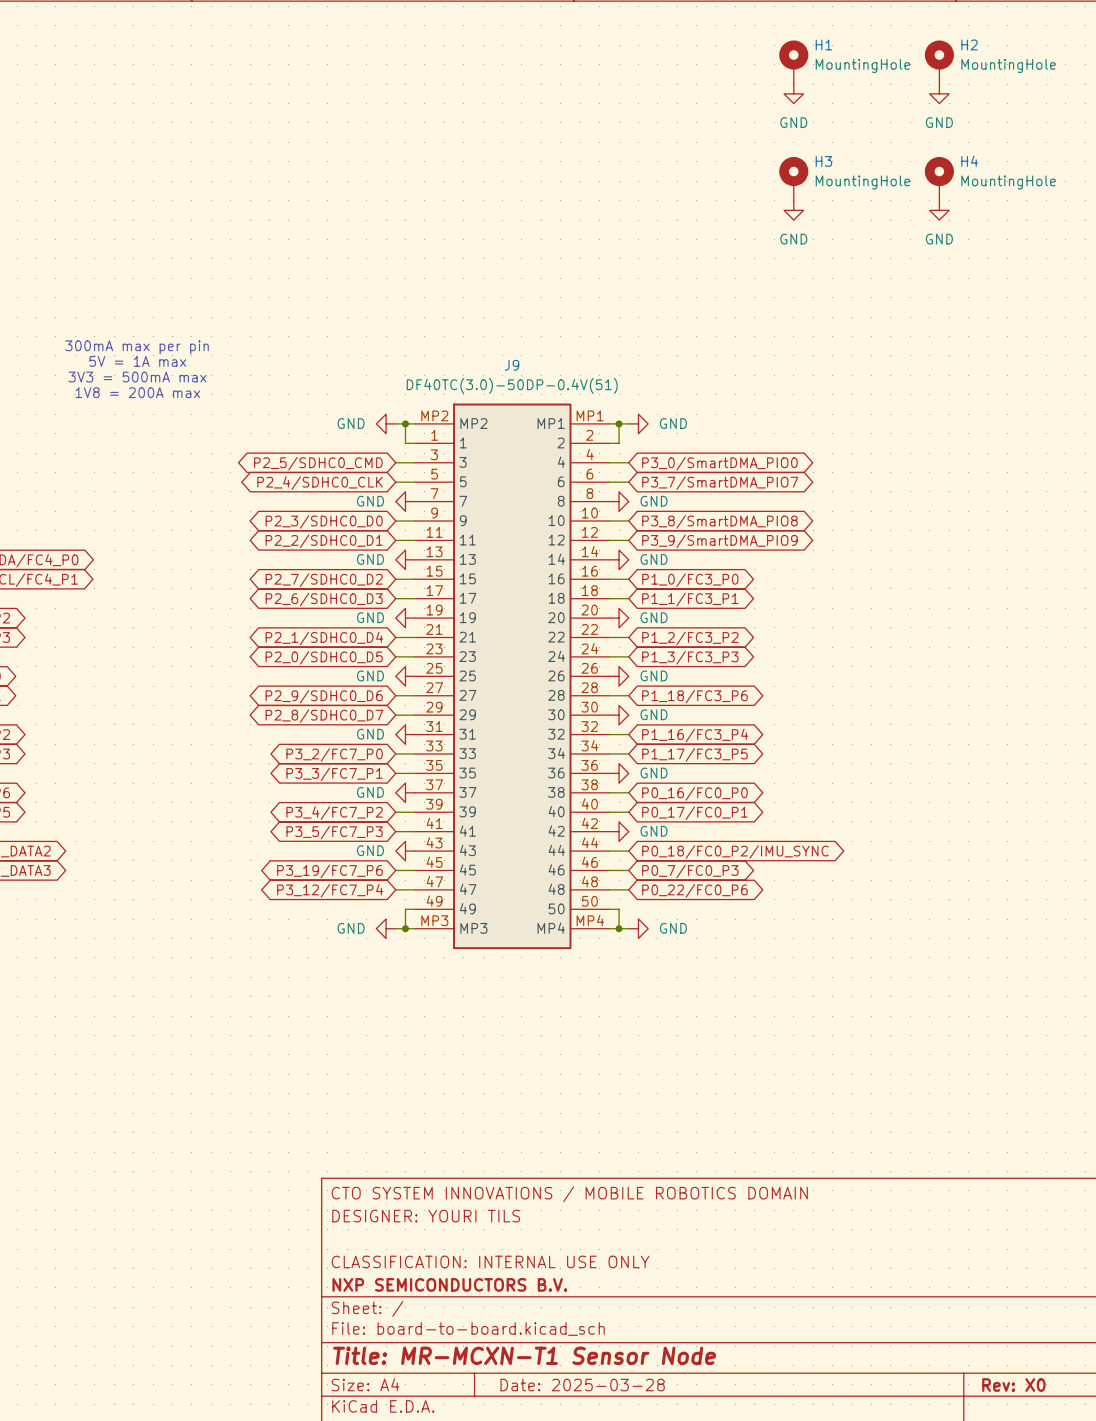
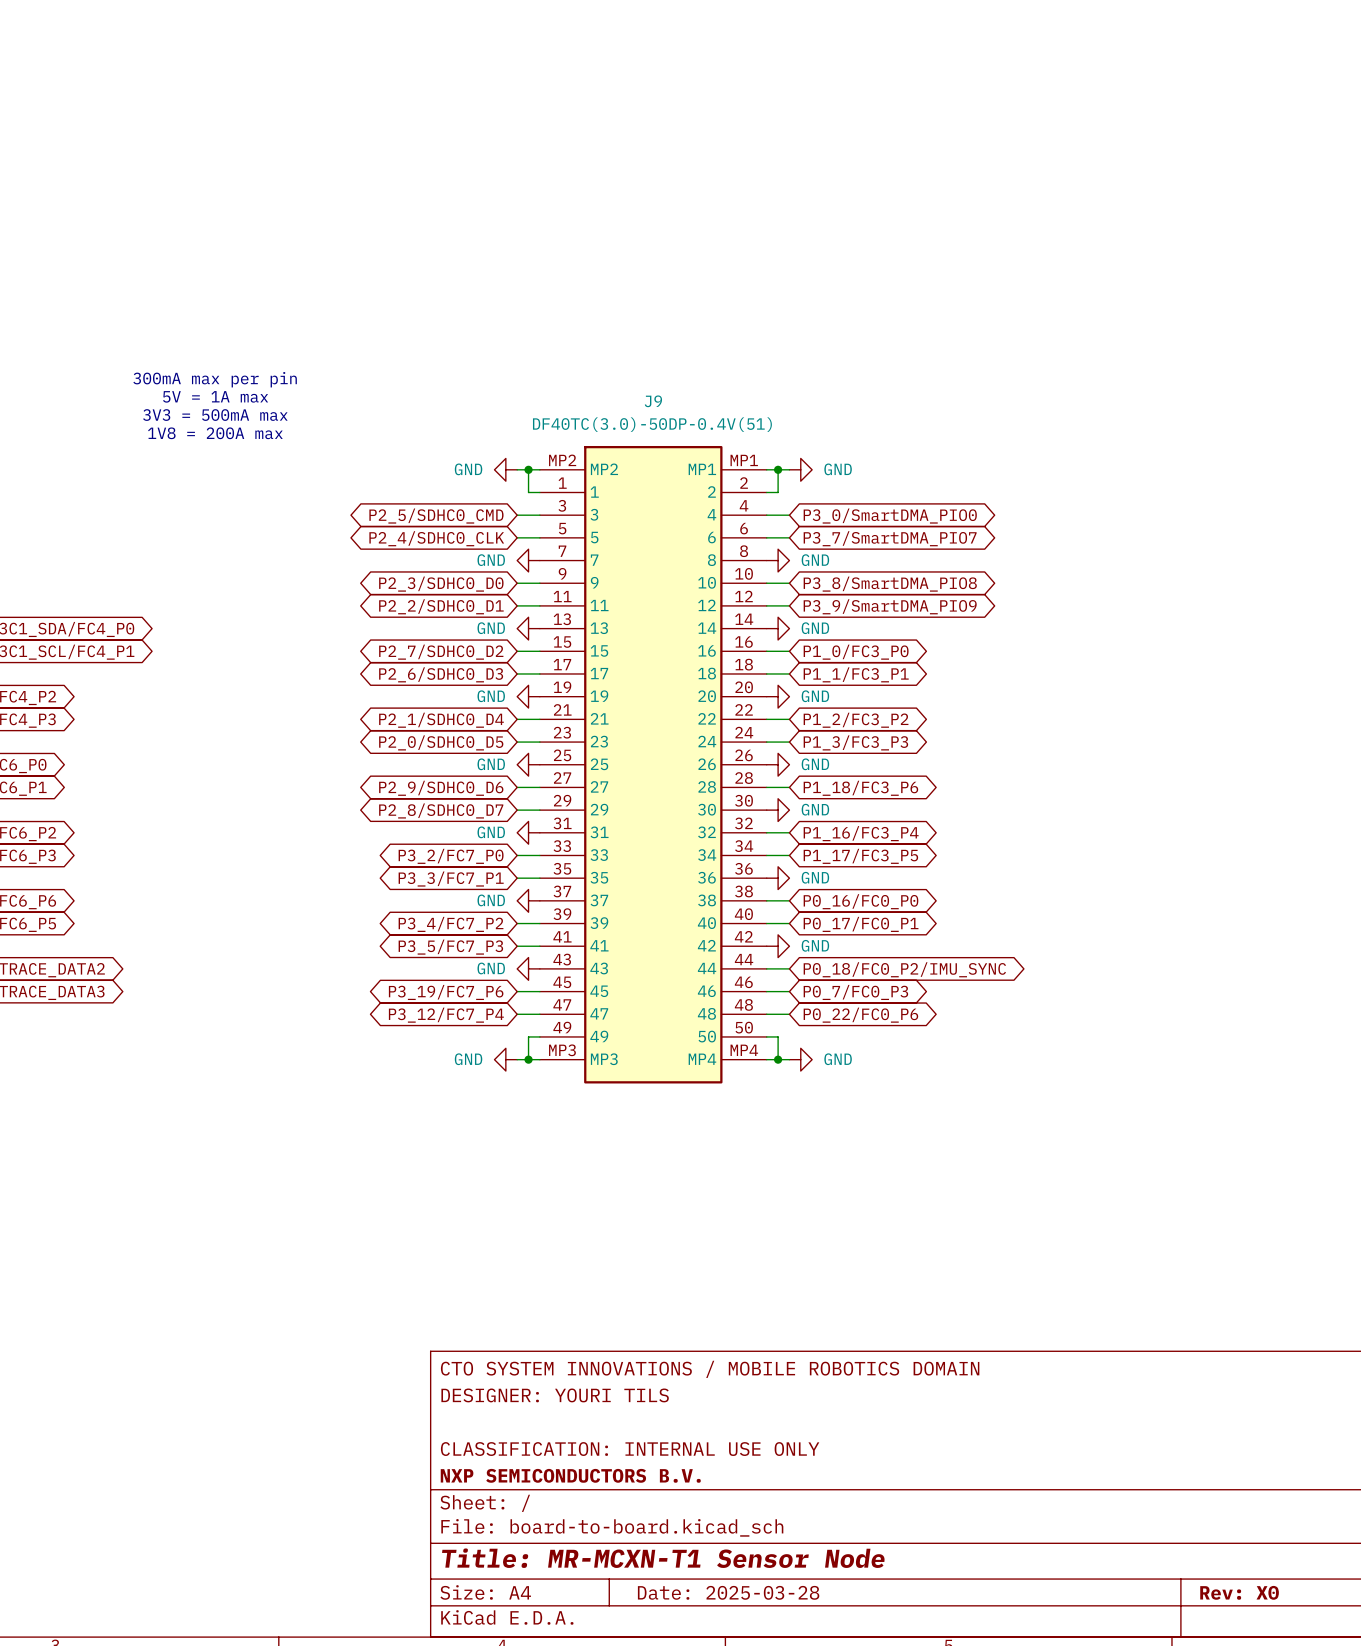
H1: MountingHole (793, 62) -> none
H2: MountingHole (939, 62) -> none
power symbol: GND (793, 93) -> none
power symbol: GND (939, 93) -> none
H3: MountingHole (793, 178) -> none
H4: MountingHole (939, 178) -> none
power symbol: GND (793, 210) -> none
power symbol: GND (939, 210) -> none

